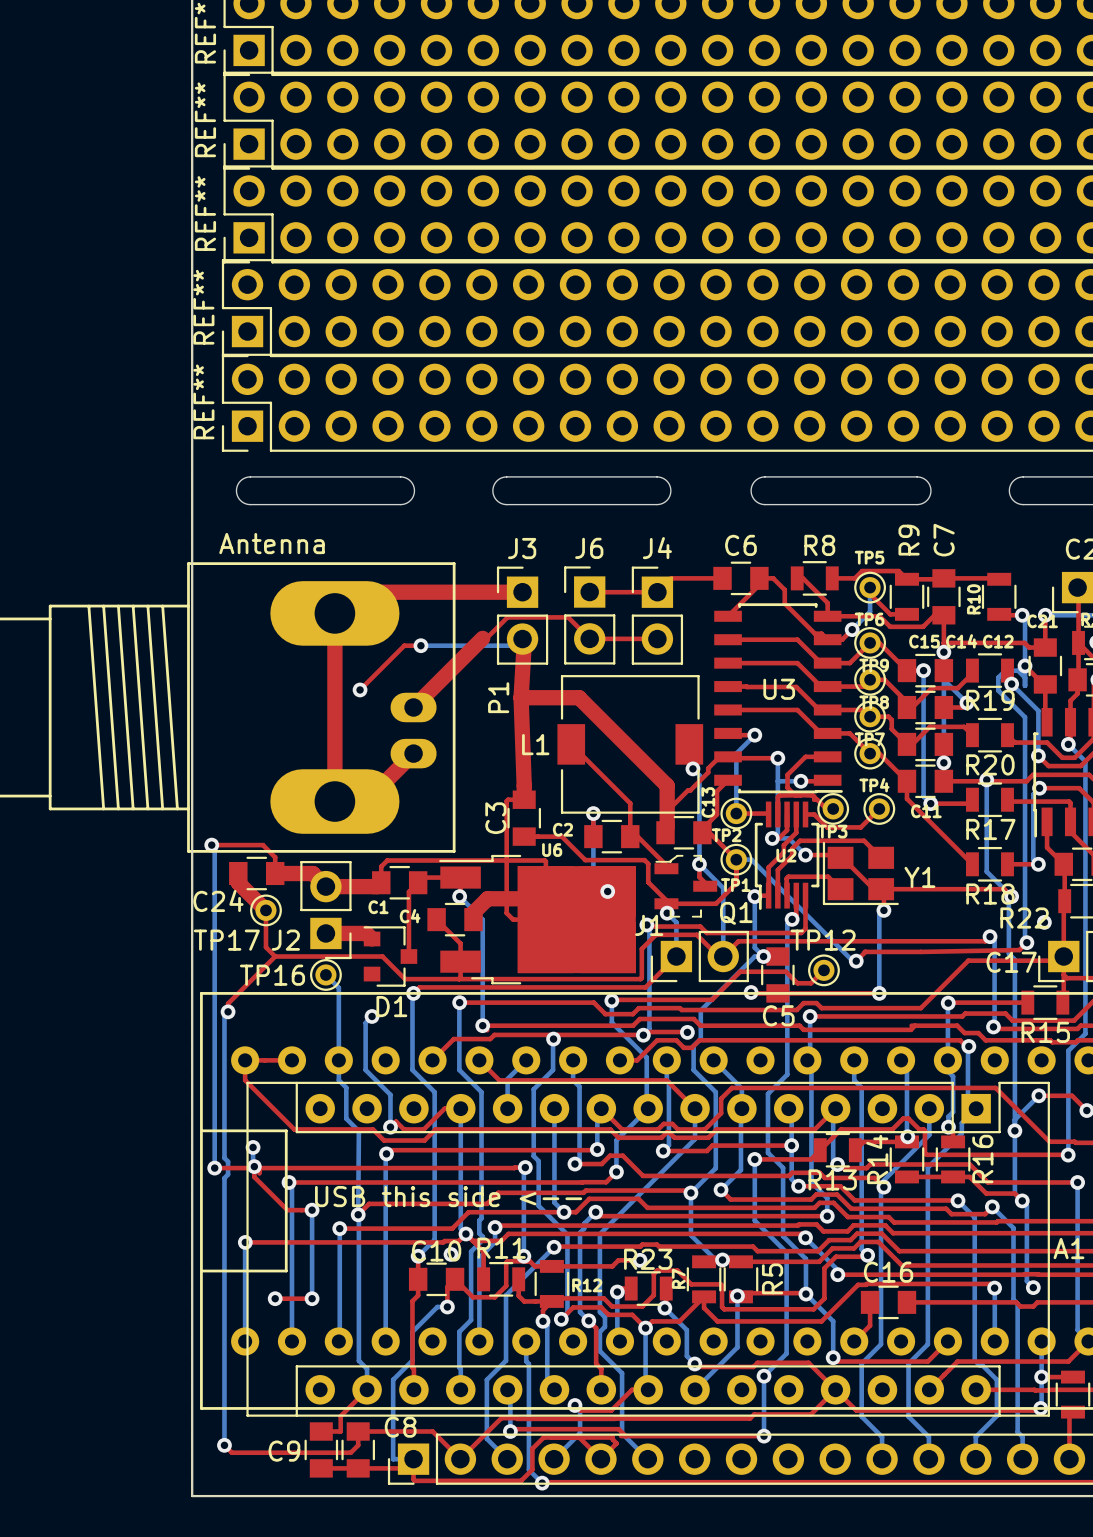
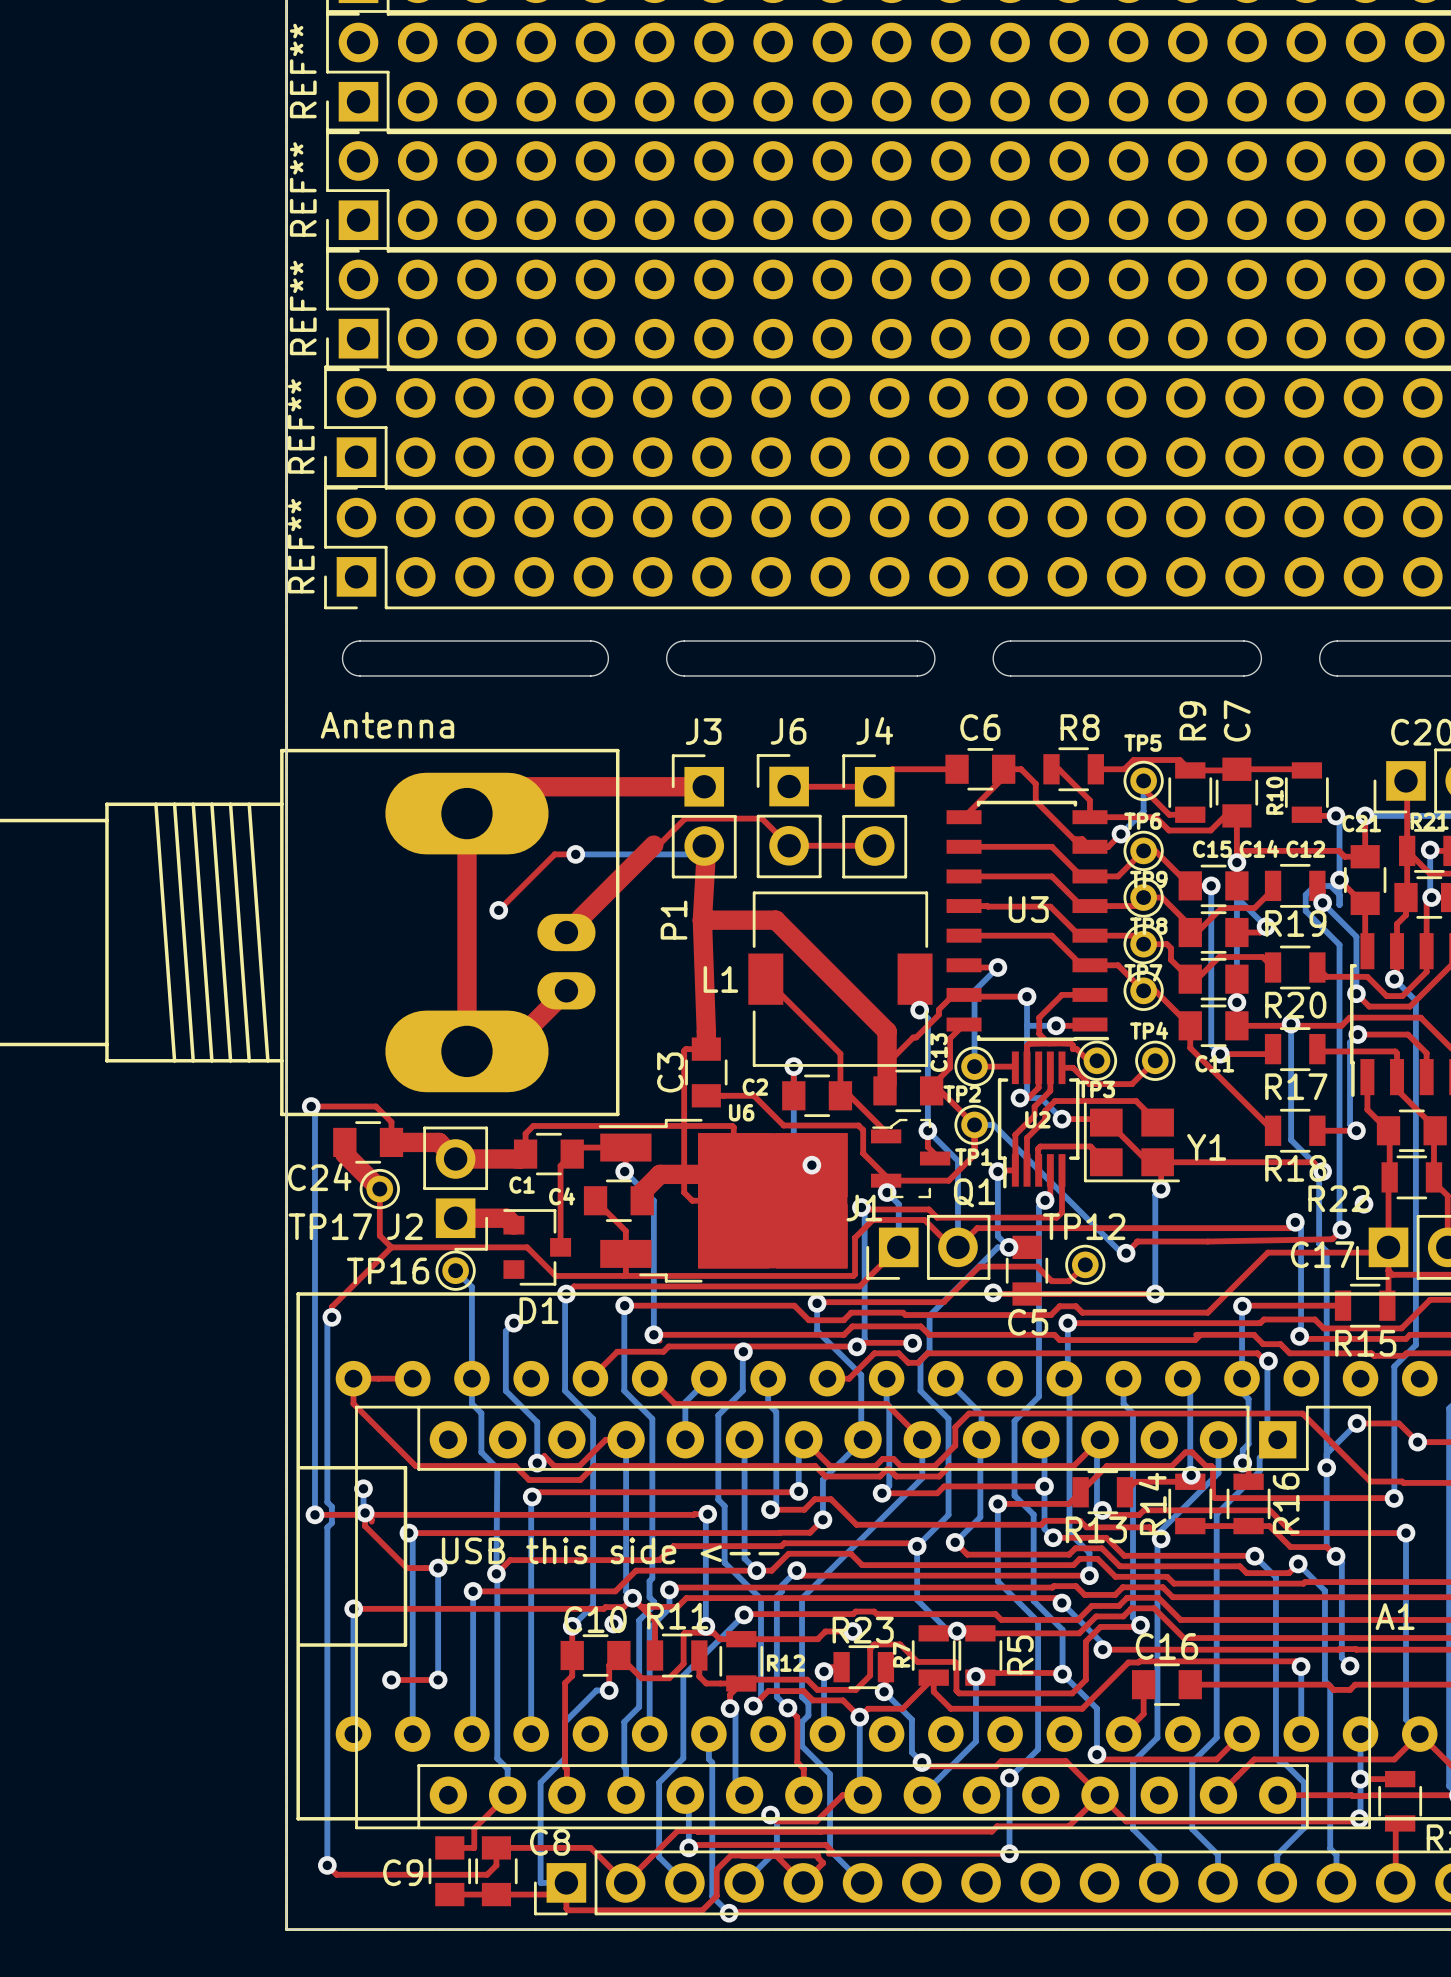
board edge: (400, 476) (410, 480) (414, 490) (410, 500) (400, 504) -> (550, 640) (595, 641) (604, 647) (608, 658) (604, 669) (595, 675) (550, 675)
board edge: (657, 476) (666, 480) (670, 490) (666, 500) (657, 504) -> (874, 640) (921, 641) (931, 647) (934, 658) (931, 669) (921, 675) (874, 675)
board edge: (917, 476) (926, 480) (930, 490) (926, 500) (917, 504) -> (1203, 640) (1248, 641) (1257, 647) (1261, 658) (1257, 669) (1248, 675) (1203, 675)

